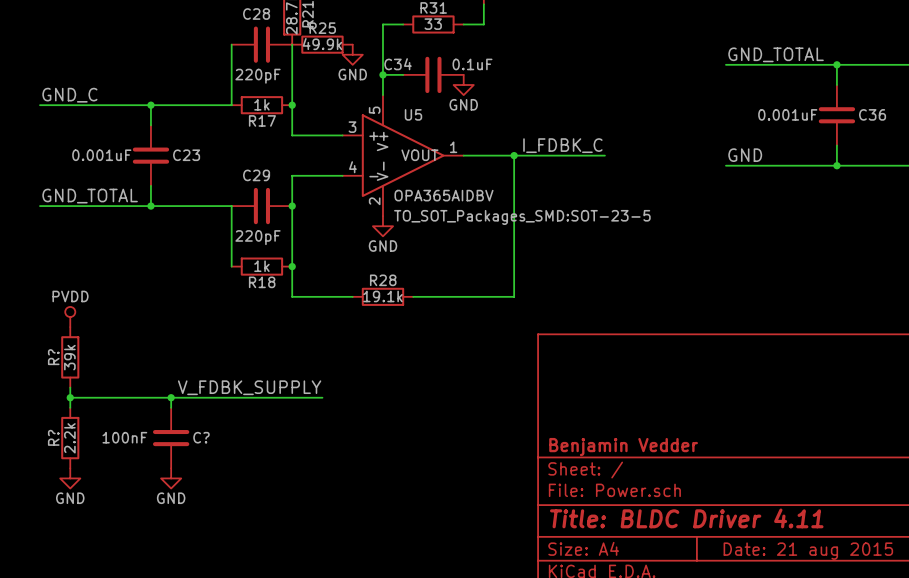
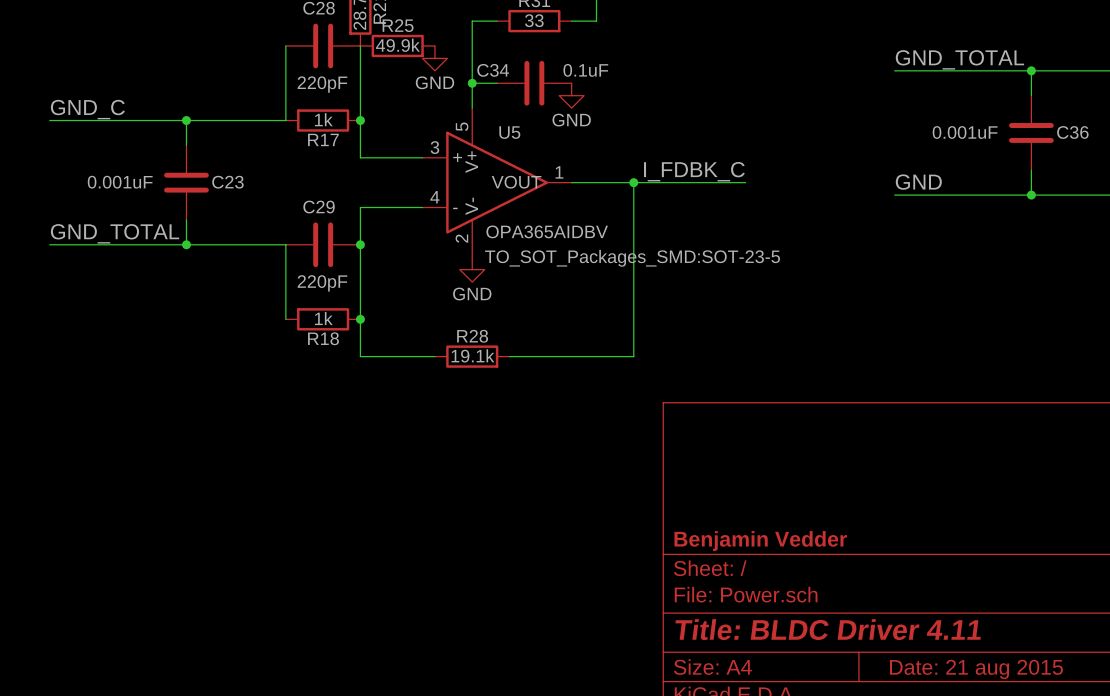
power symbol: PVDD (70, 317) -> none
R?: 39k (70, 357) -> none
wire: (70, 387) (70, 407) -> none
label: V_FDBK_SUPPLY (249, 387) -> none
wire: (70, 397) (322, 397) -> none
junction: (70, 397) -> none
wire: (171, 397) (171, 407) -> none
junction: (171, 397) -> none
R?: 2.2k (70, 438) -> none
C?: 100nF (171, 438) -> none
power symbol: GND (70, 478) -> none
power symbol: GND (171, 478) -> none

